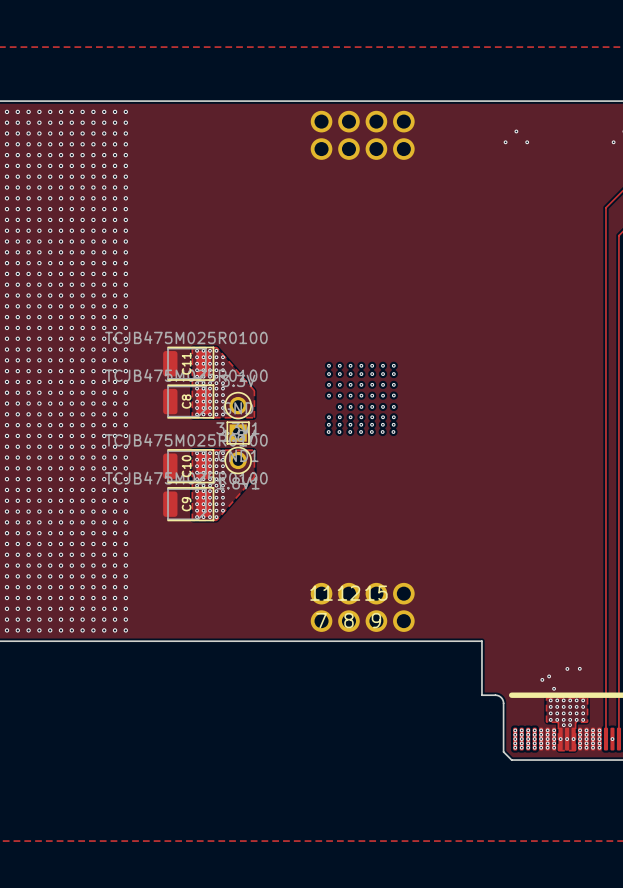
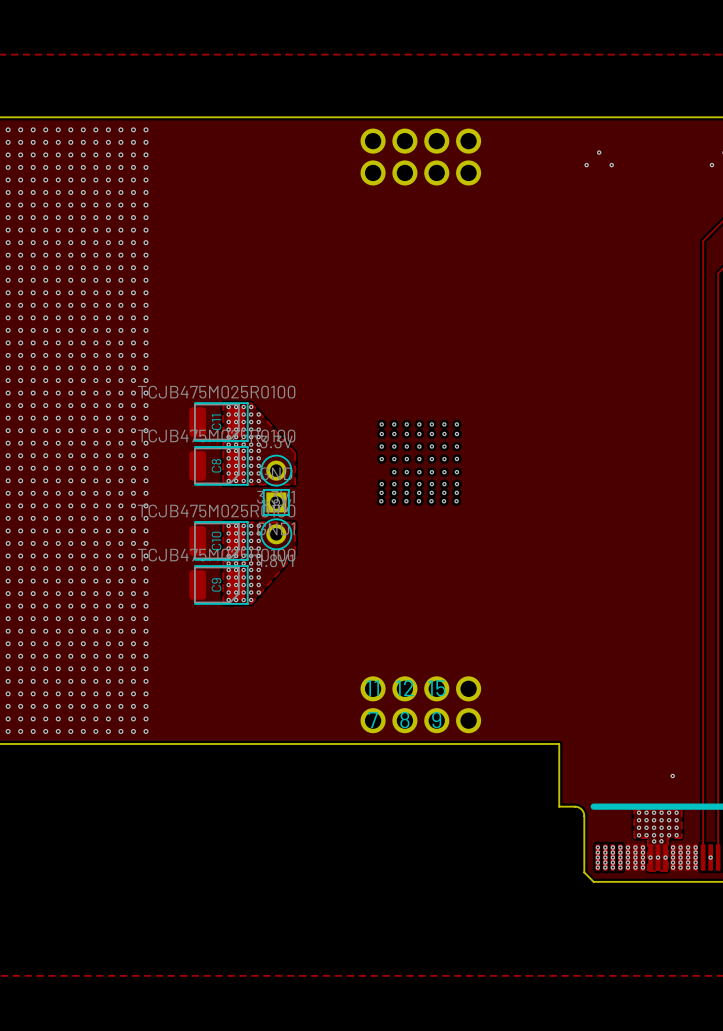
via: (567, 668) -> none
via: (549, 676) -> none
via: (542, 679) -> none
via: (554, 688) -> none

